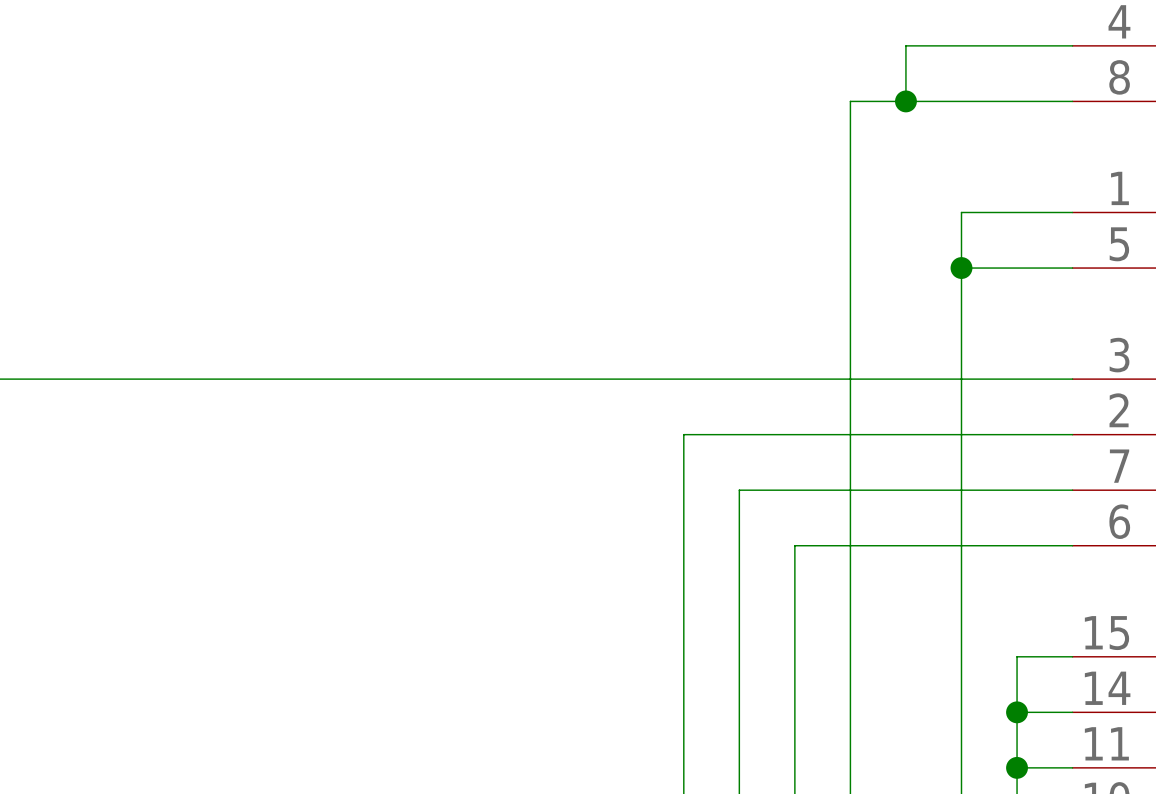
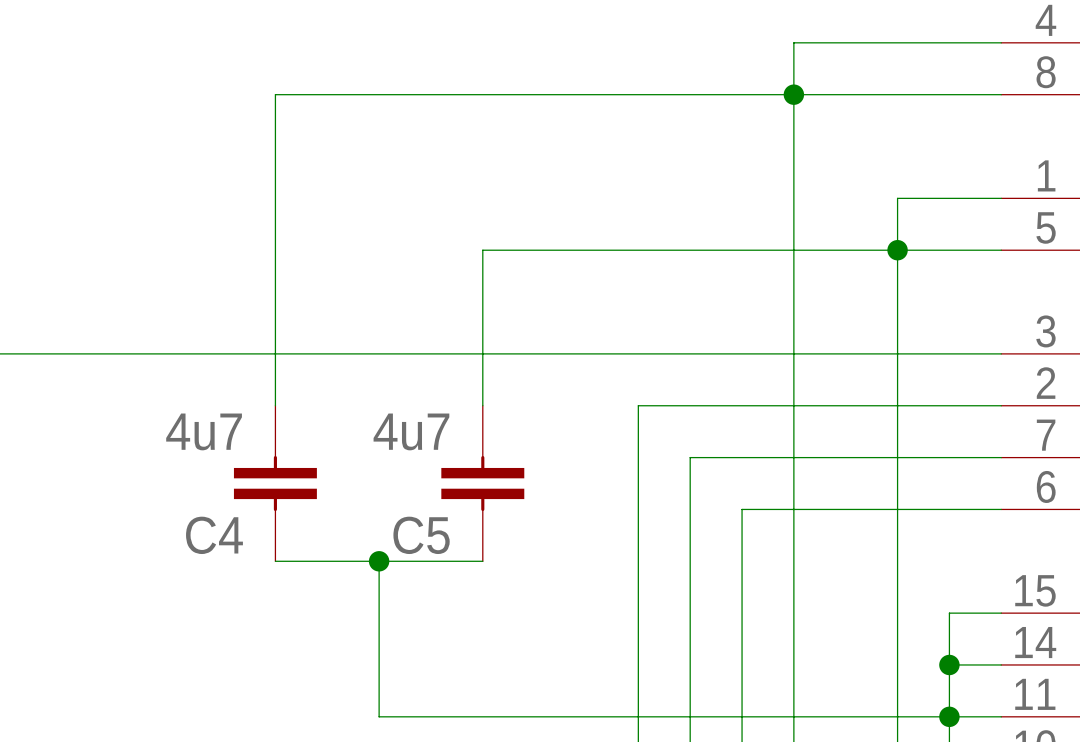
wire: (905, 45) (905, 101) -> (845, 42) (793, 42) (793, 94) (275, 94) (275, 405)
junction position: (905, 101) -> (793, 94)
wire: none -> (897, 250) (482, 250) (482, 405)
C4: none -> 4u7 (275, 483)
C5: none -> 4u7 (482, 483)
wire: none -> (275, 561) (482, 561)
wire: none -> (379, 561) (379, 716) (949, 716)
junction: none -> (379, 561)

